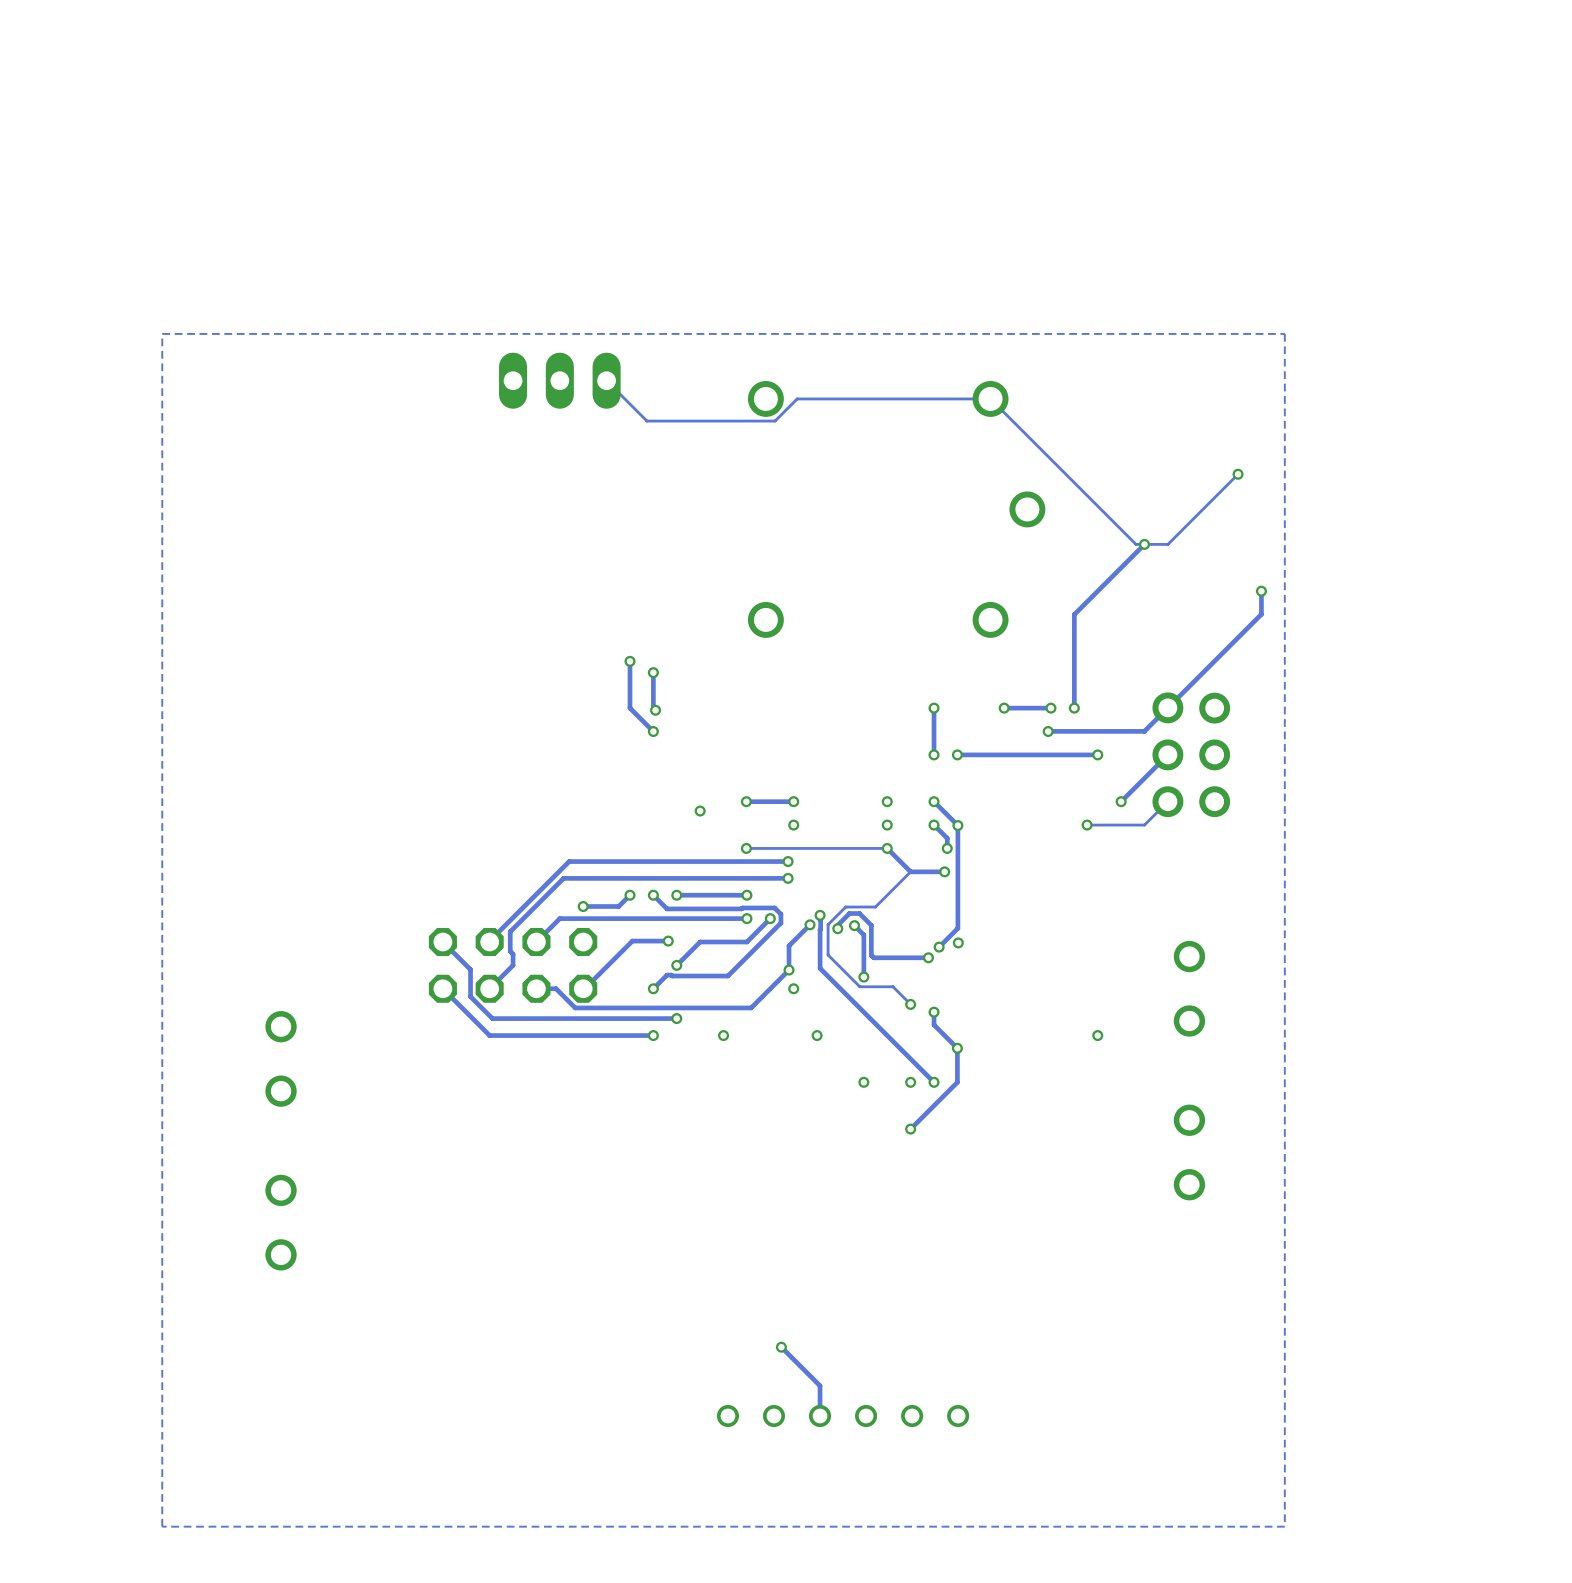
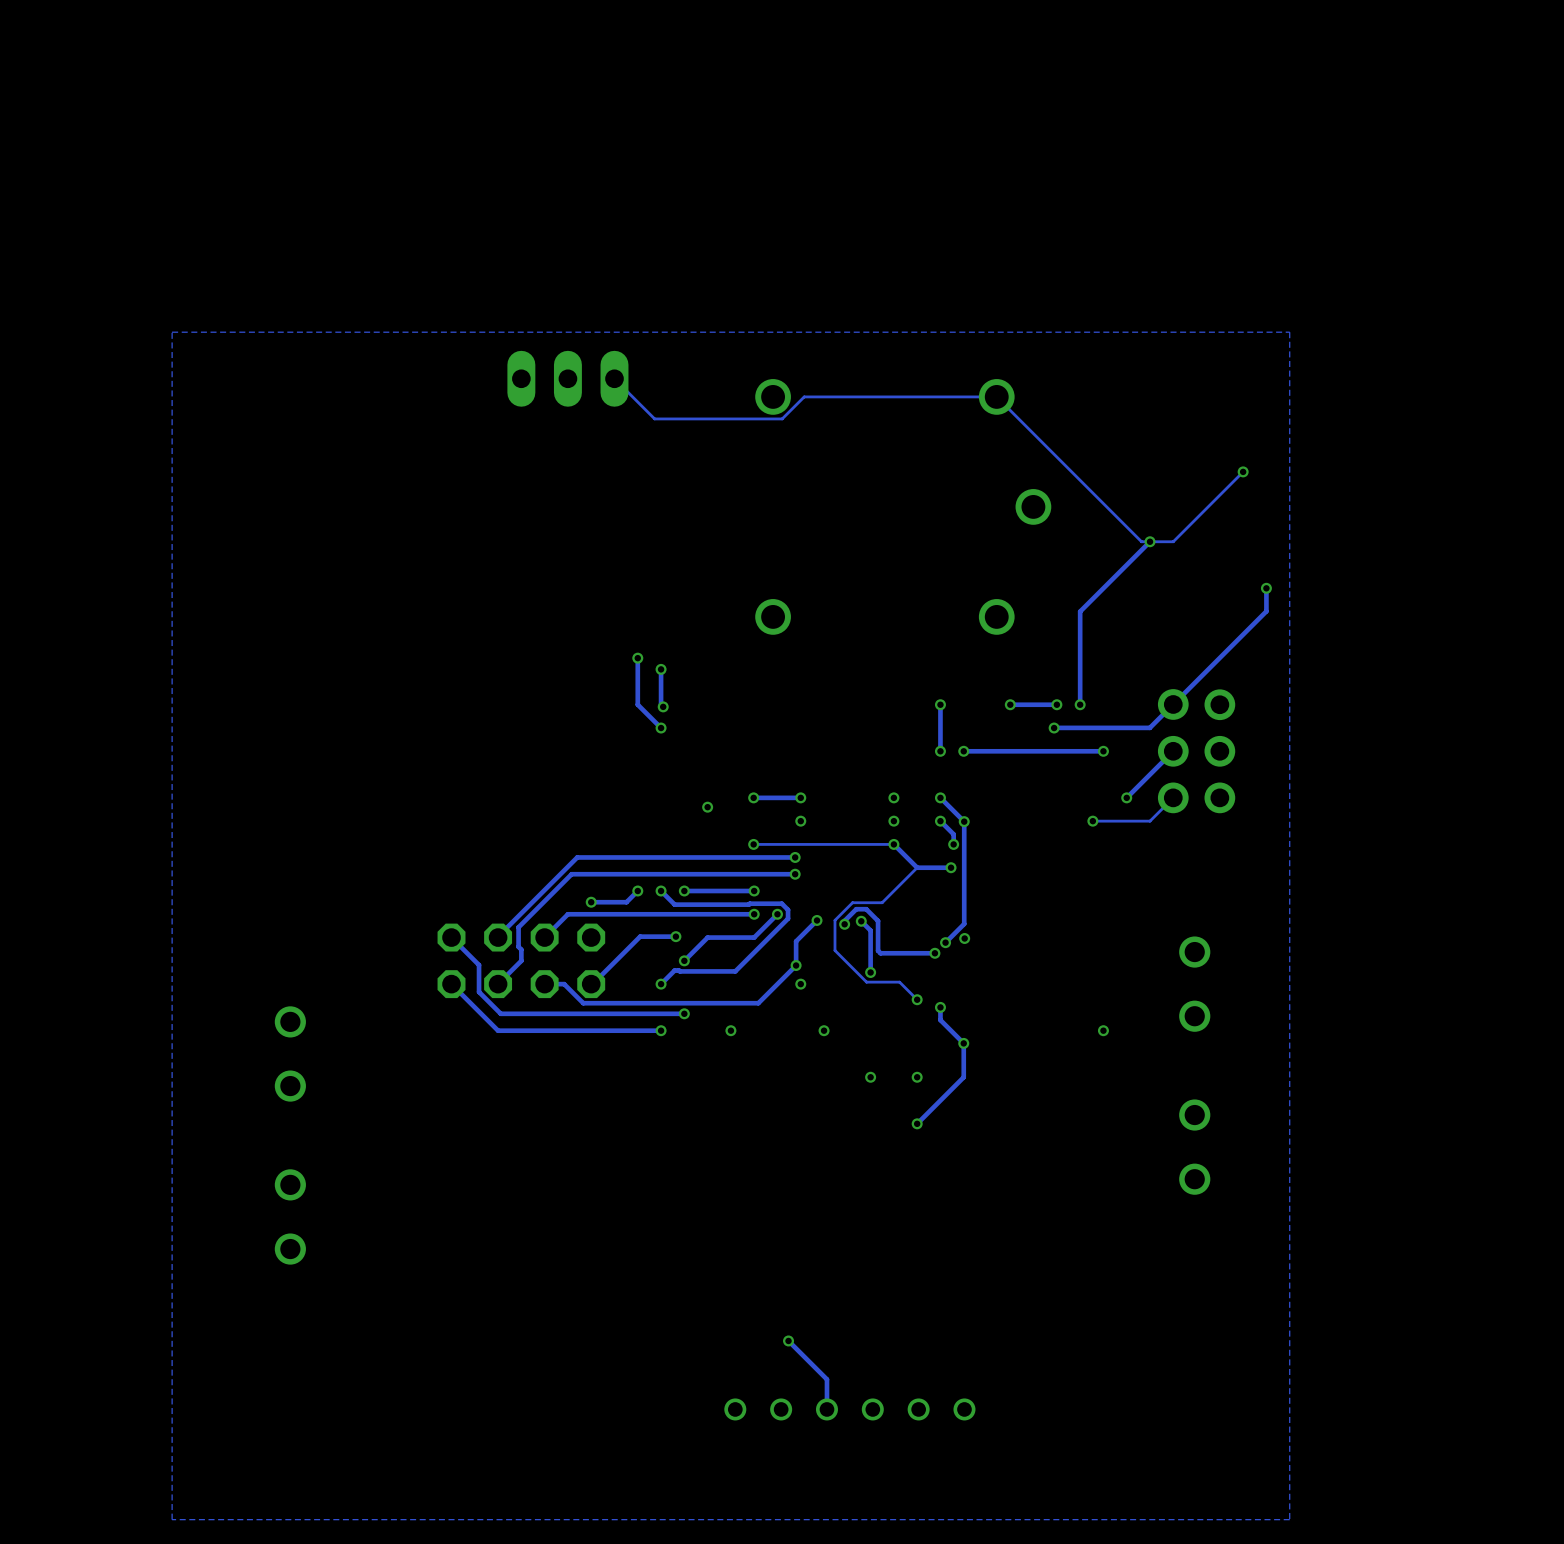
track: (820, 915) (820, 968) (934, 1082) -> none
via: (820, 915) -> none
via: (934, 1082) -> none

